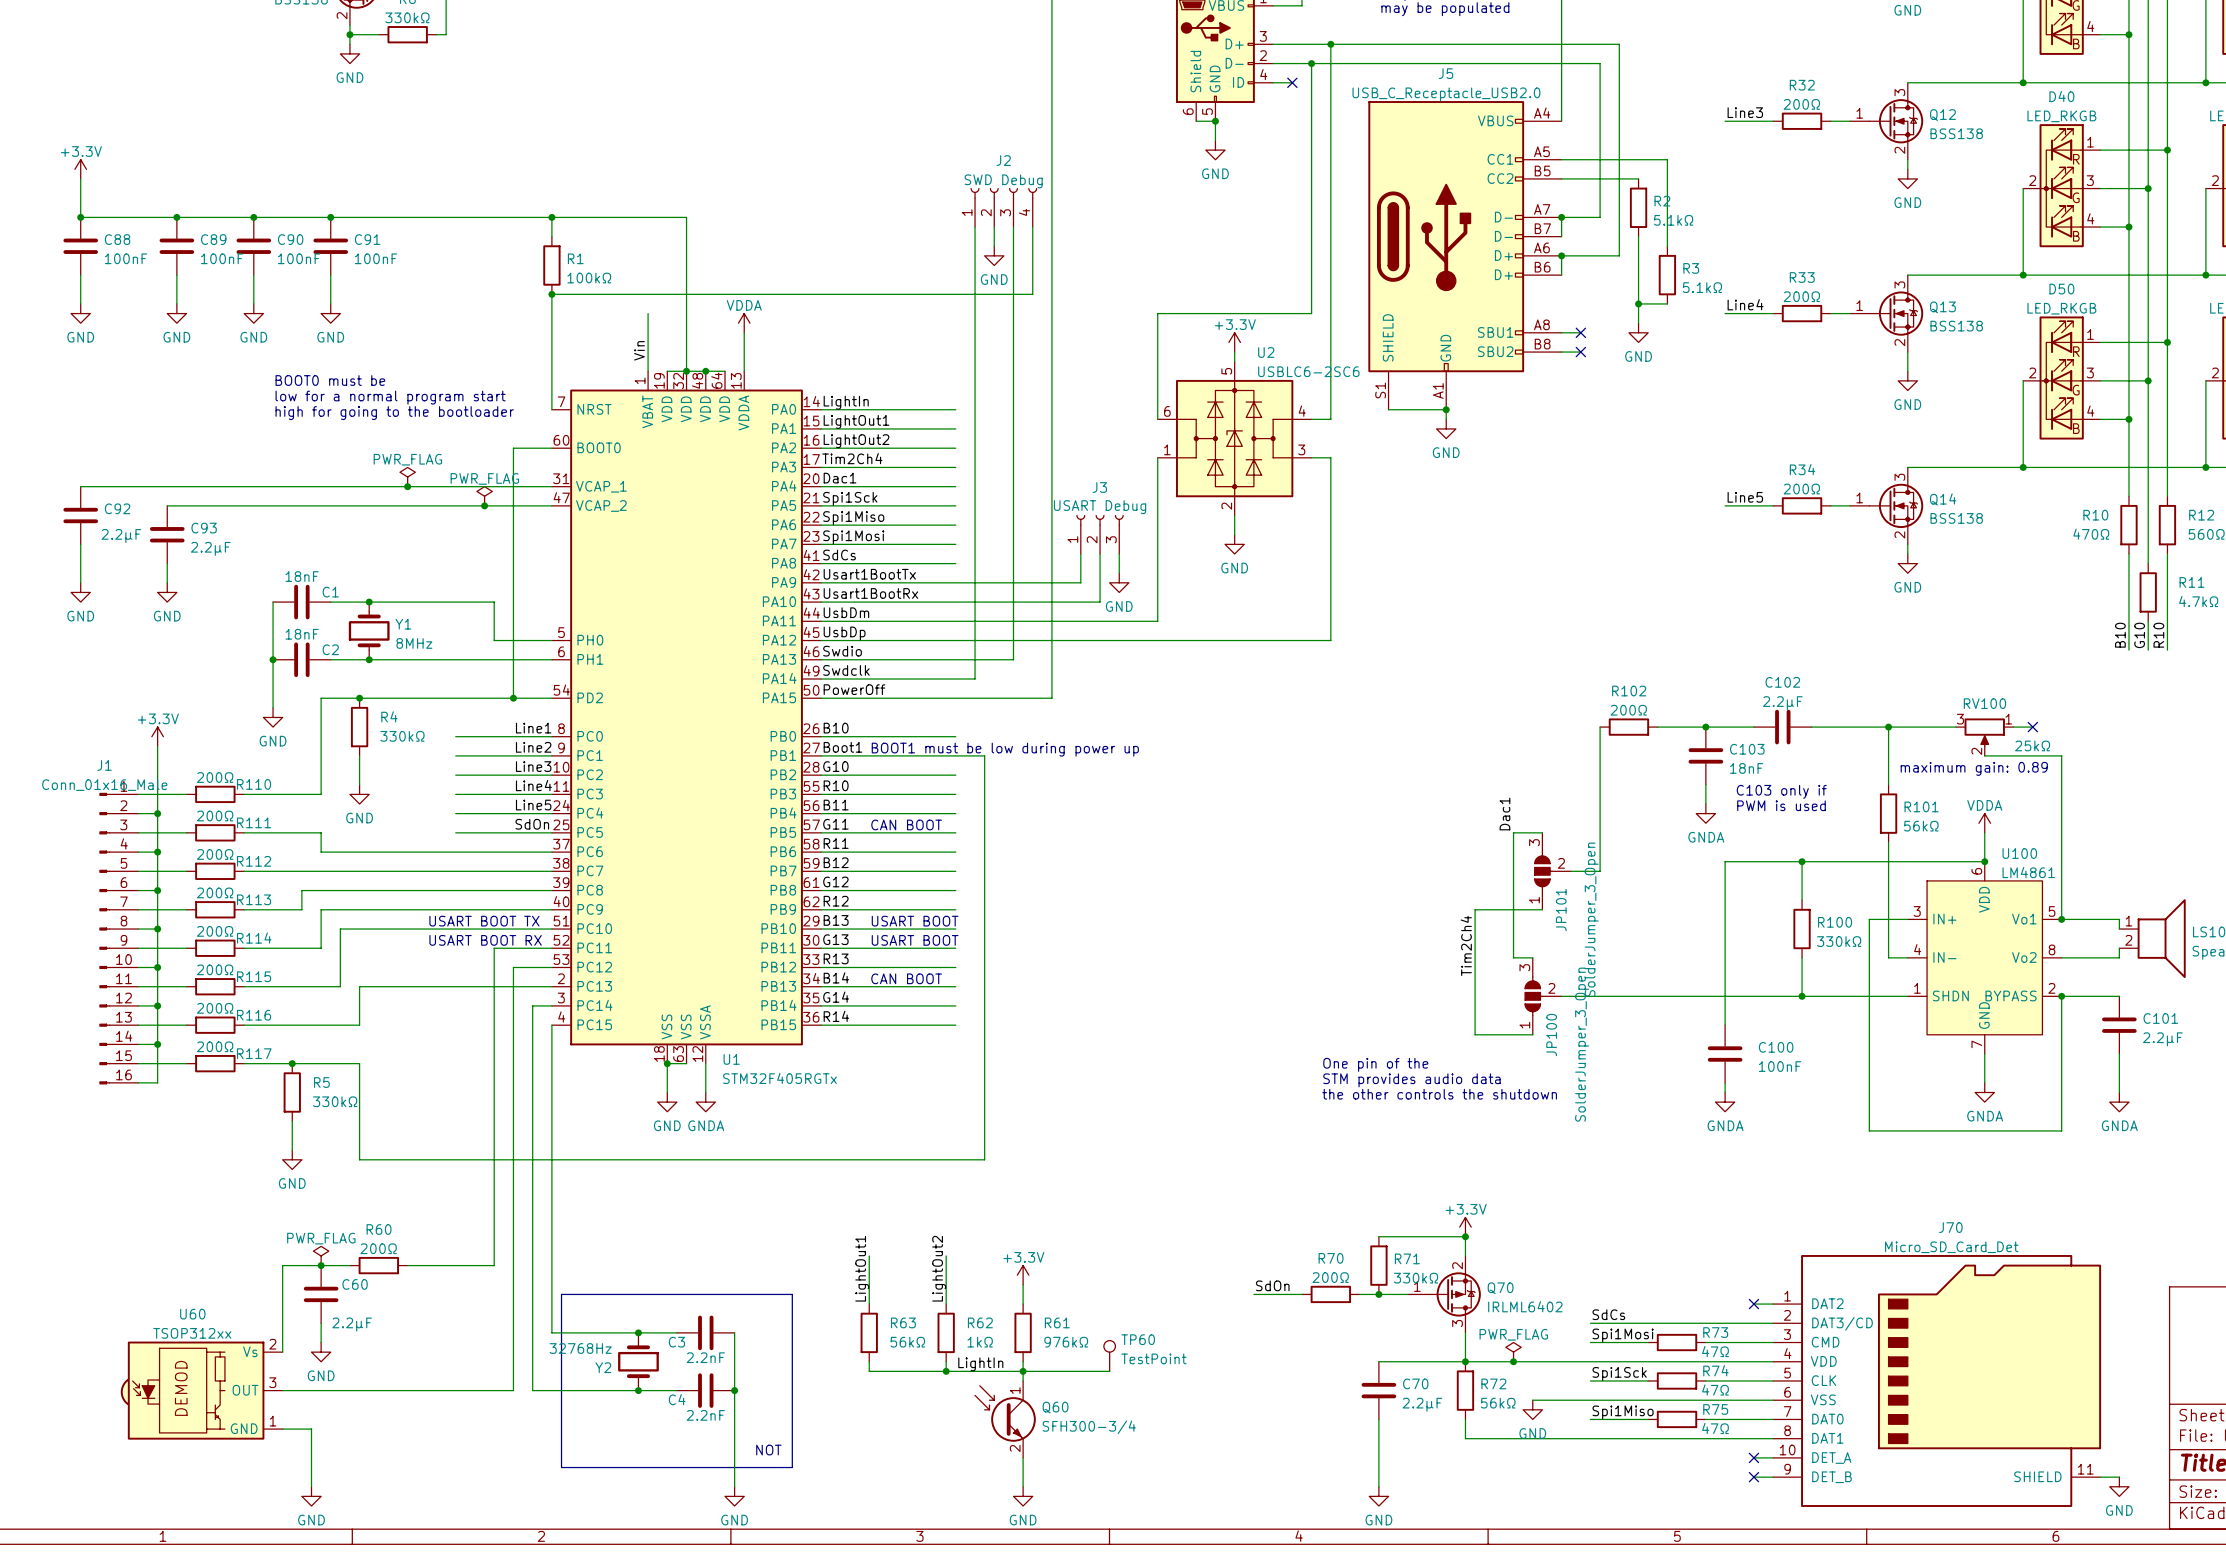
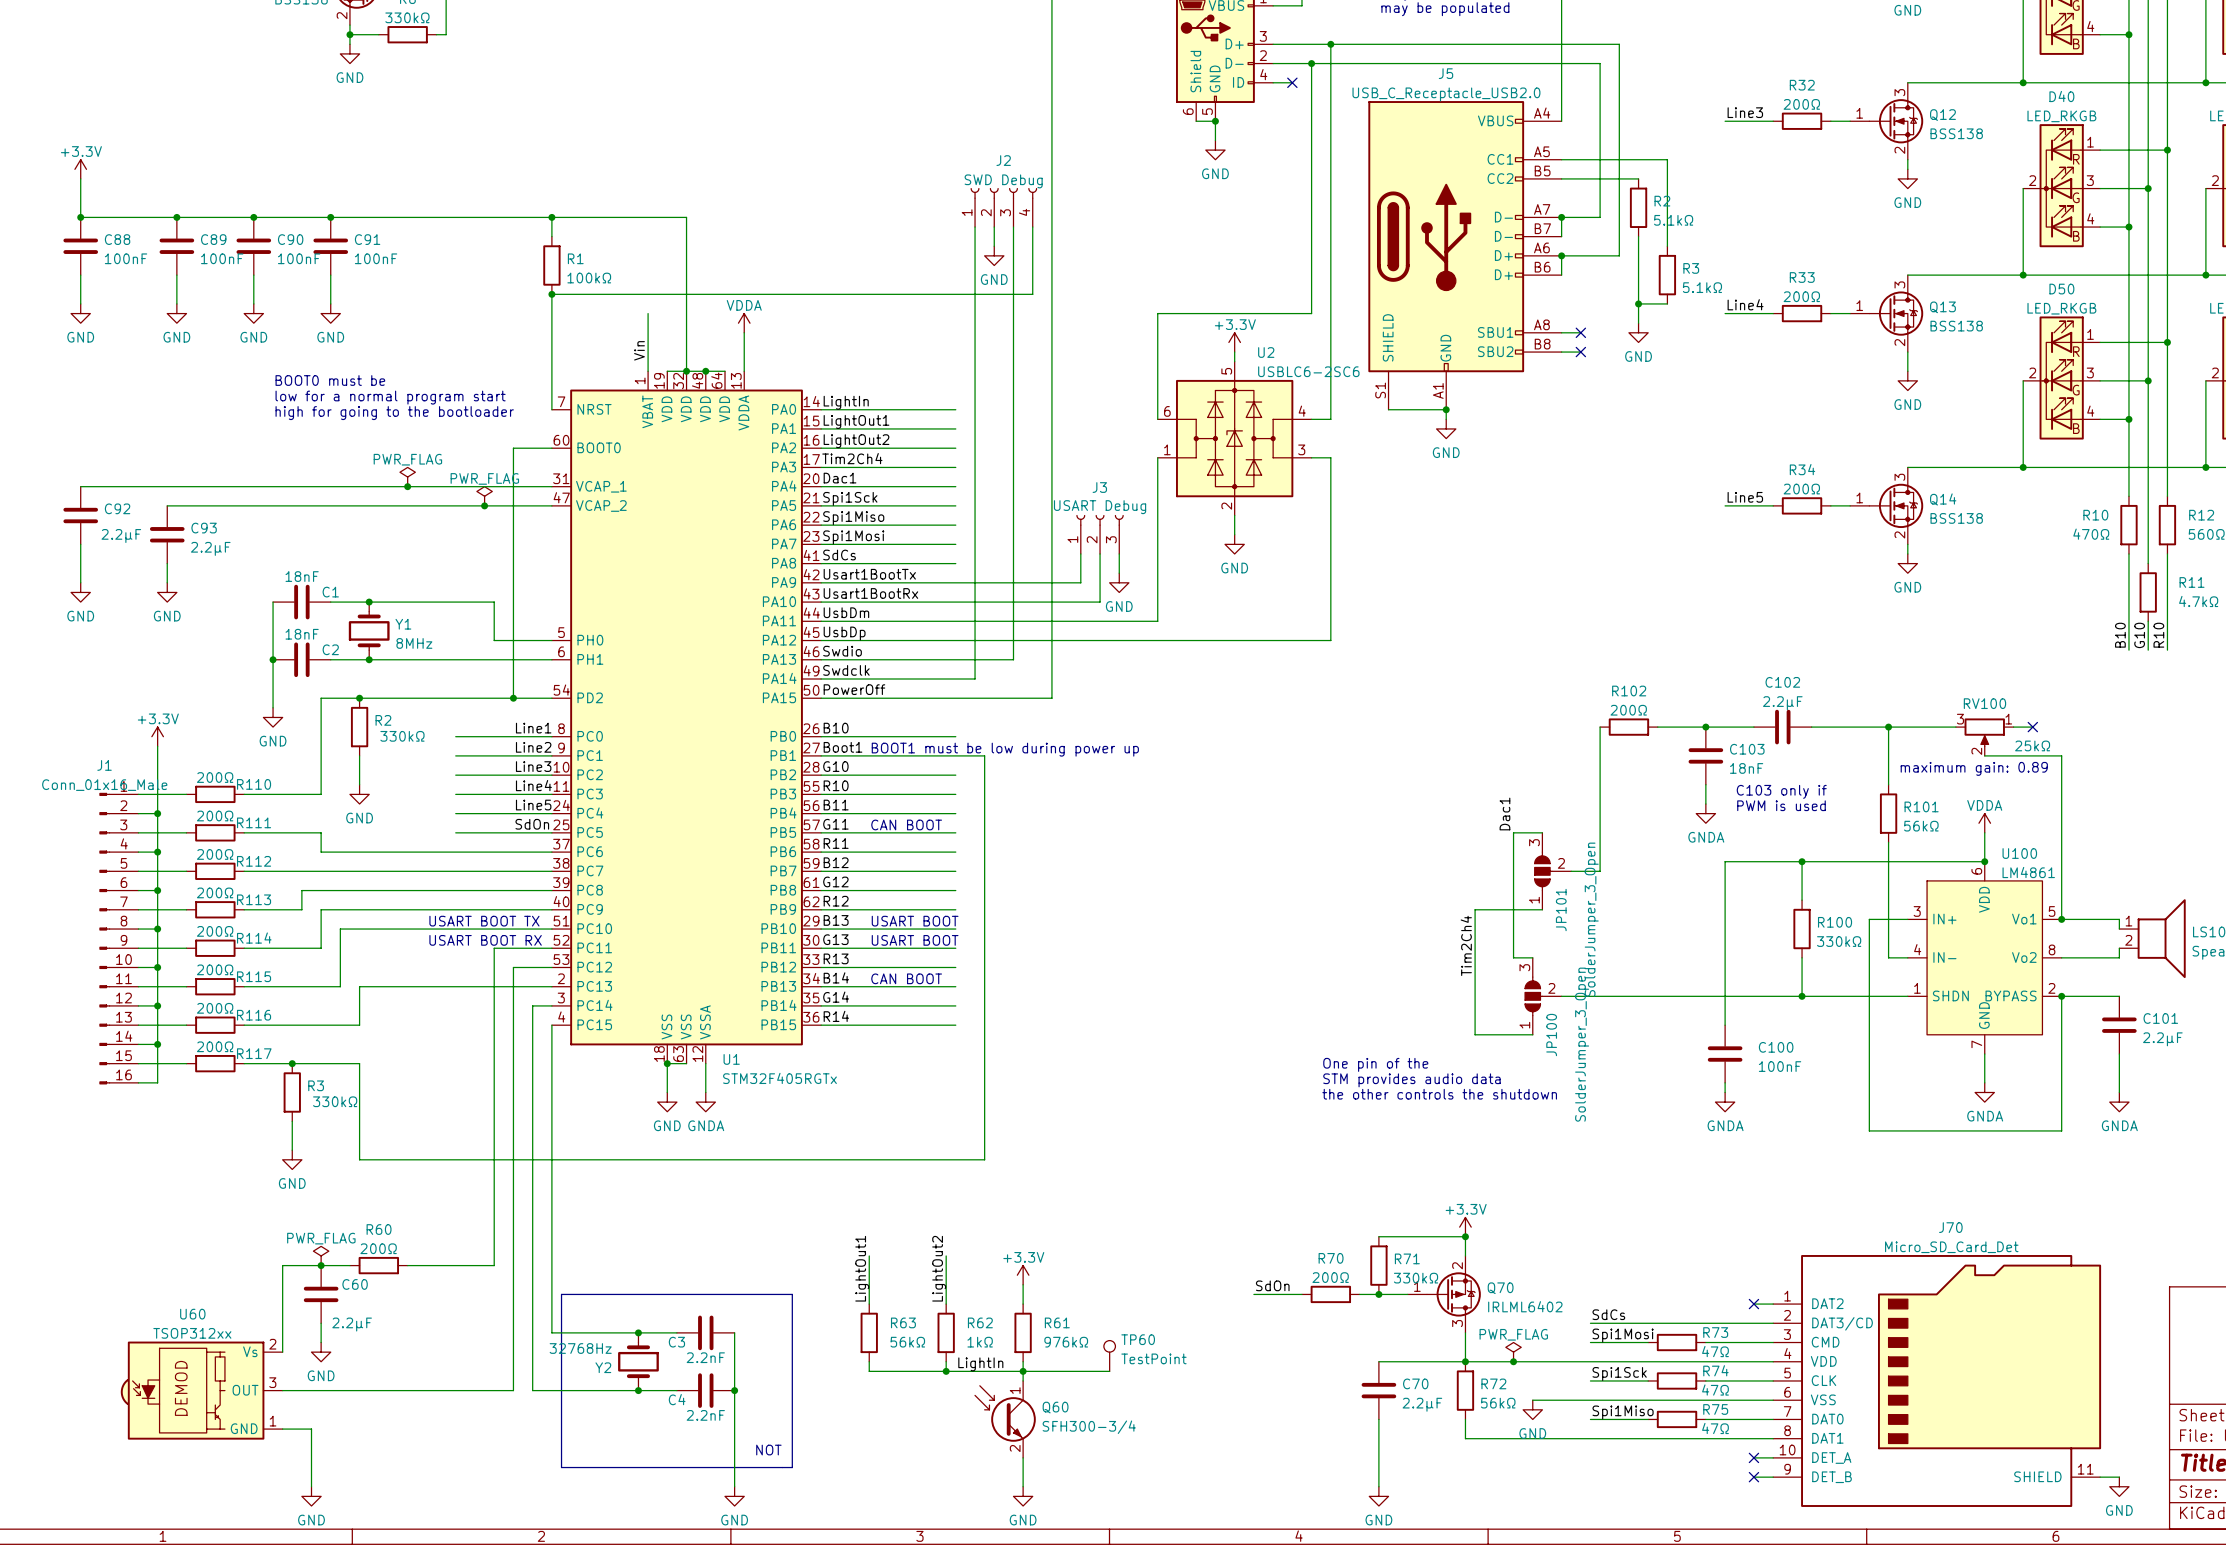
R4 name: R4 (389, 716) -> R2 (383, 720)
R5 name: R5 (321, 1082) -> R3 (316, 1085)

